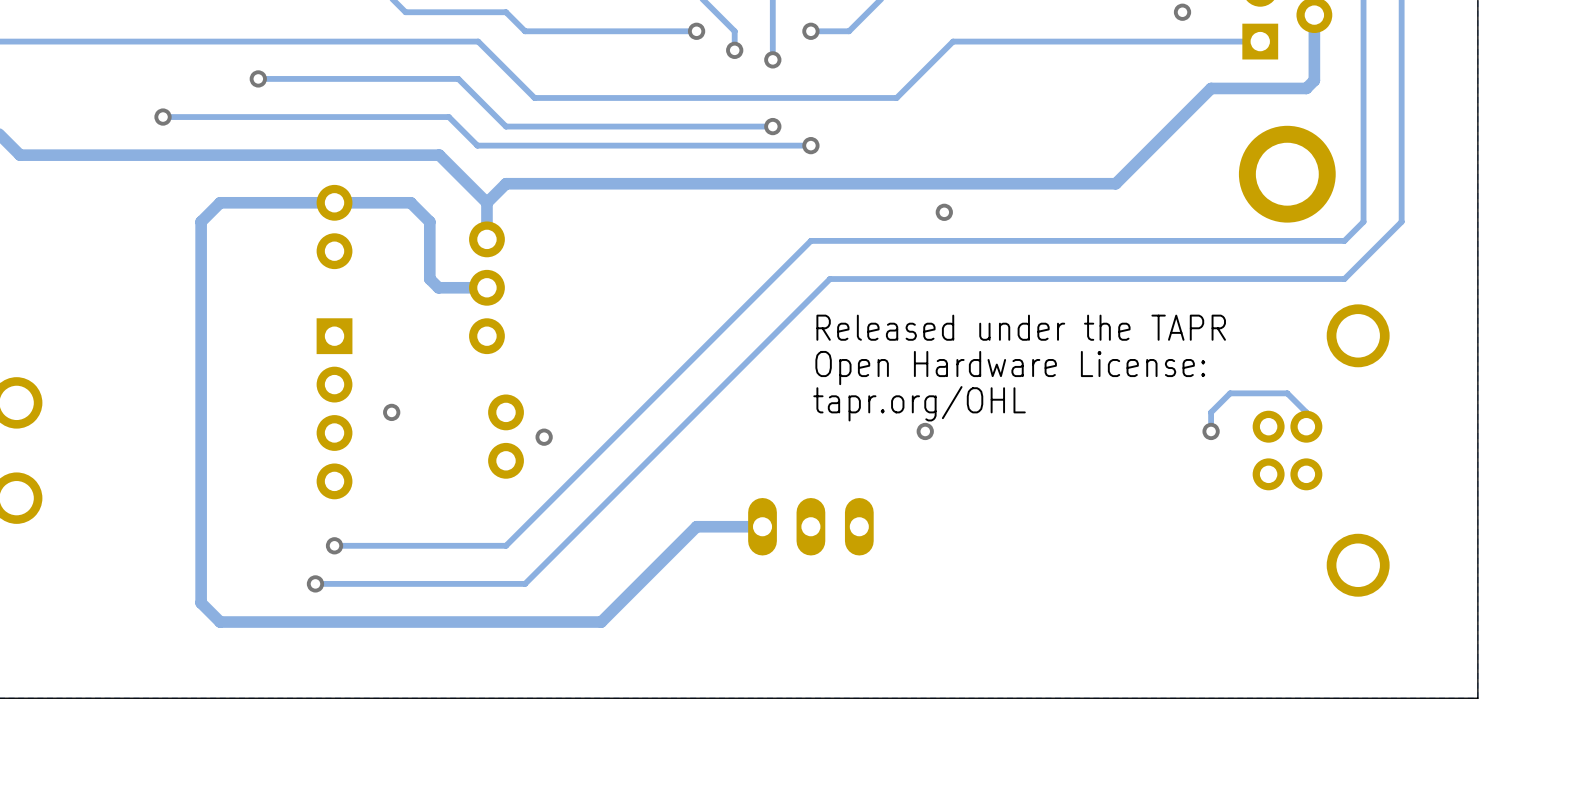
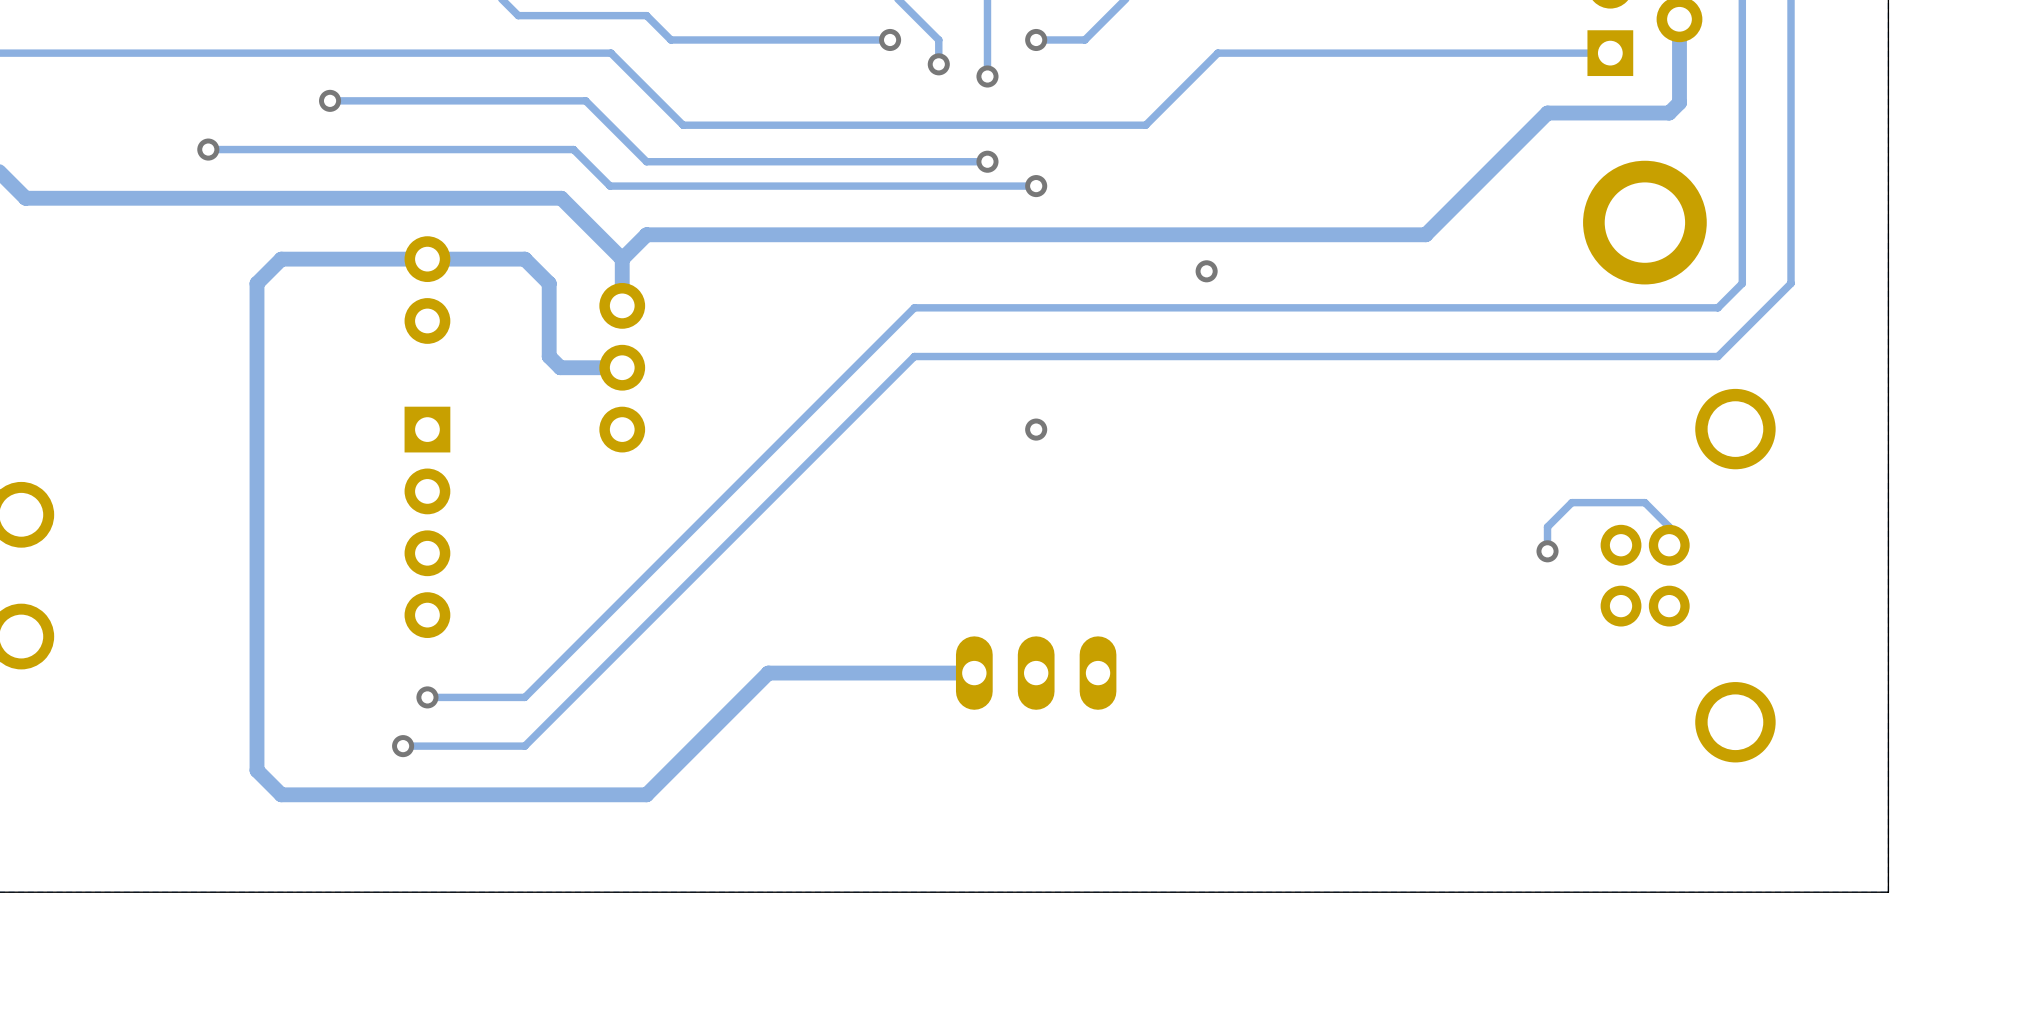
via: (1182, 12) -> none
track: (810, 240) (506, 545) (410, 545) -> (1036, 307) (914, 307) (524, 697)
track: (829, 279) (525, 583) (410, 583) -> (1060, 356) (914, 356) (524, 746)
text: Released under the TAPR (1021, 327) -> none
via: none -> (1036, 429)
text: Open Hardware License: (1010, 368) -> none
text: tapr.org/OHL (919, 403) -> none
via: (391, 412) -> none
via: (925, 431) -> none
part: (506, 436) -> none
via: (544, 437) -> none
track: (696, 526) (601, 622) (506, 622) -> (890, 673) (768, 673) (646, 794)

